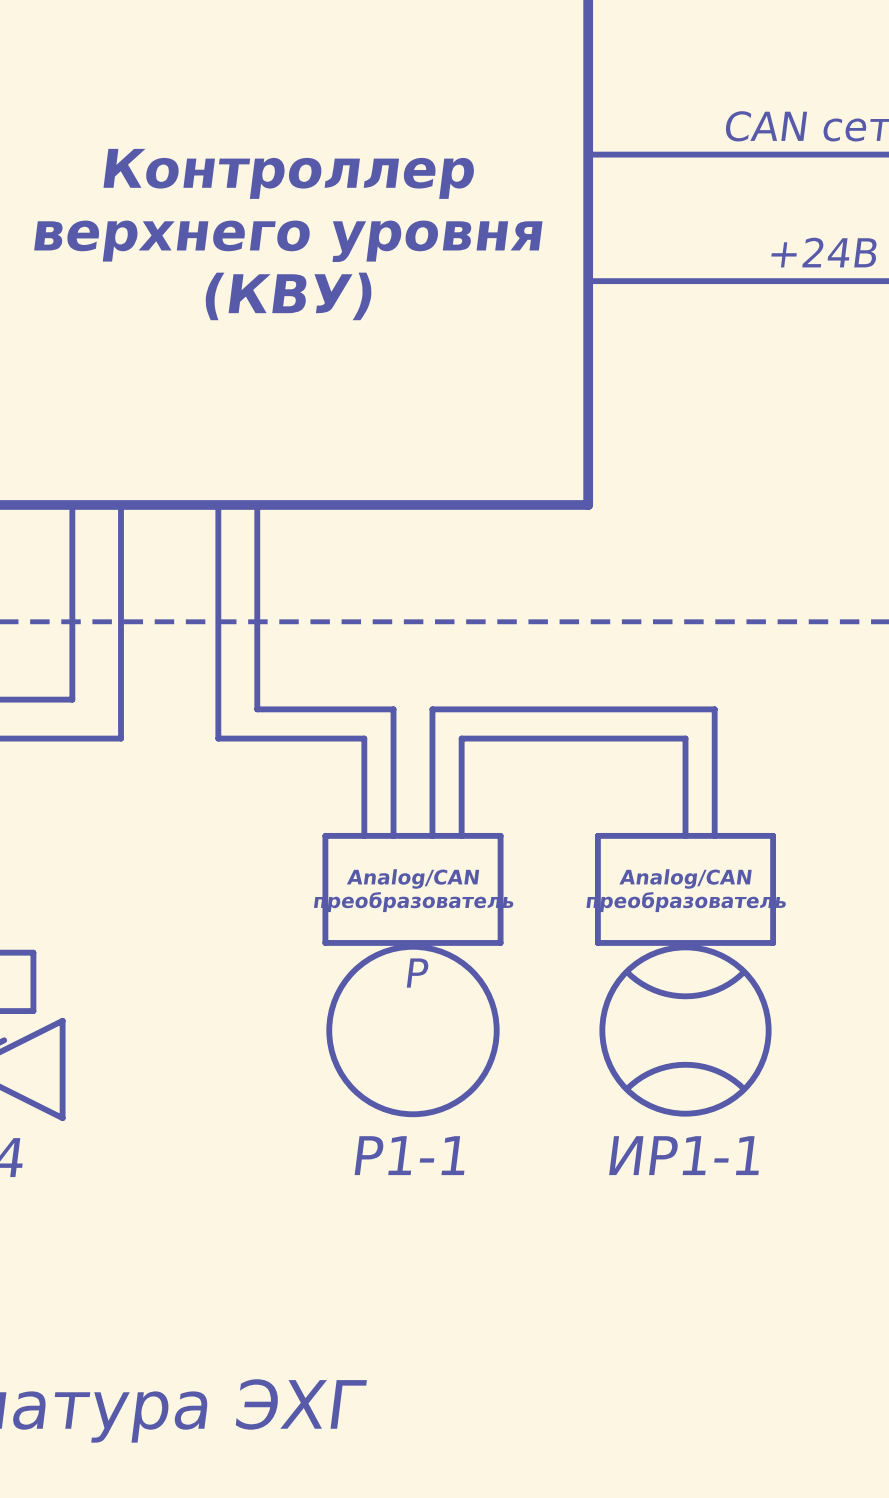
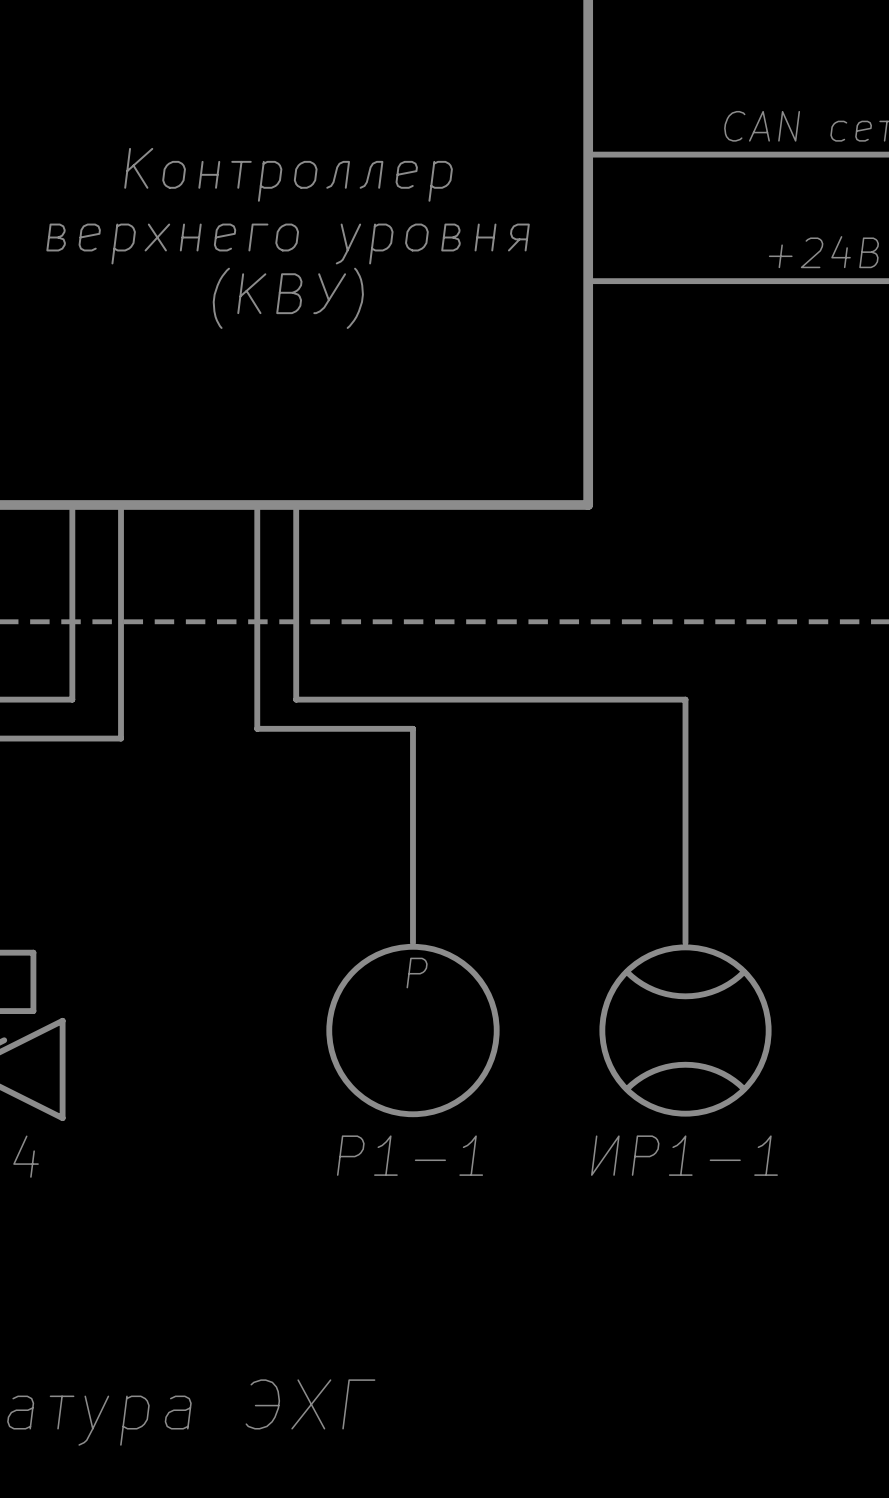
line: (218, 504) (218, 738) (364, 738) (364, 835) -> none
line: (257, 709) (393, 709) (393, 835) -> (257, 709) (257, 728) (412, 728) (412, 942)
line: (685, 738) (461, 738) (461, 835) -> (685, 738) (685, 699) (296, 699) (296, 504)
line: (325, 835) (500, 835) (500, 942) (325, 942) (325, 835) -> none
line: (432, 835) (432, 709) (714, 709) (714, 835) -> none
line: (597, 835) (773, 835) (773, 942) (597, 942) (597, 835) -> none
line: none -> (685, 835) (685, 942)
text: Analog/CAN (413, 878) -> none
text: Analog/CAN (685, 878) -> none
text: преобразователь (413, 902) -> none
text: преобразователь (686, 902) -> none

